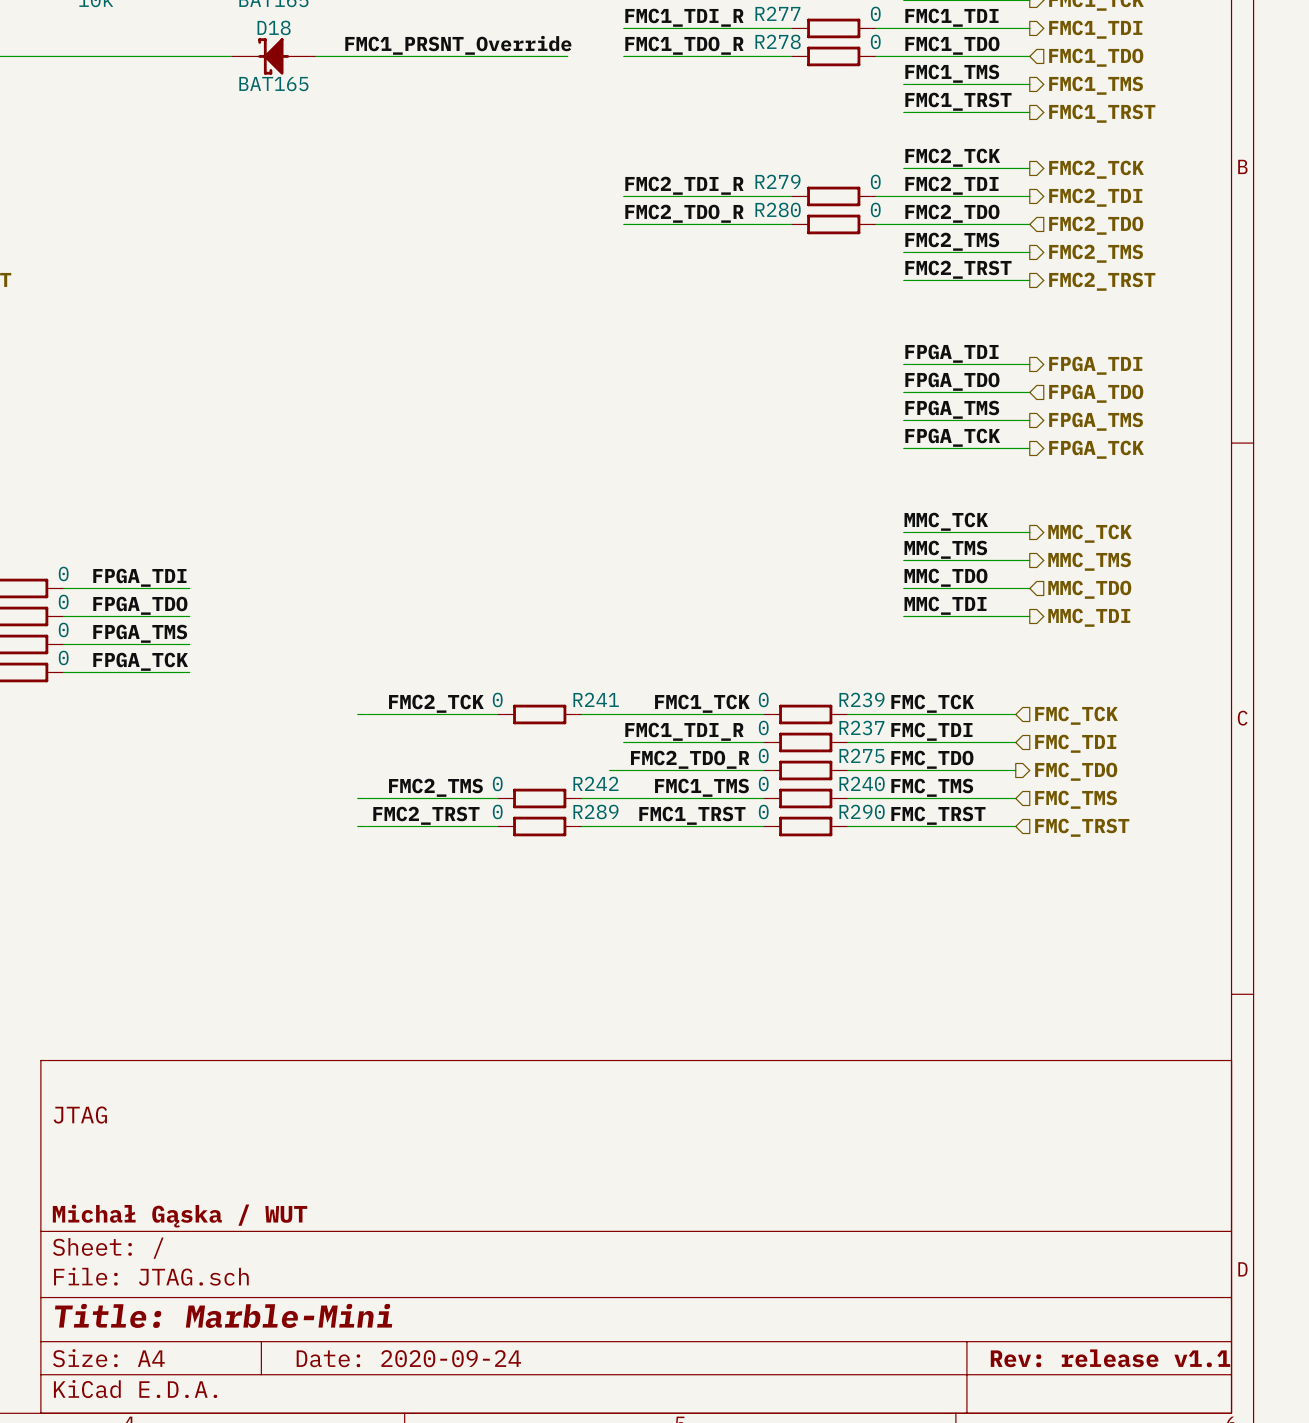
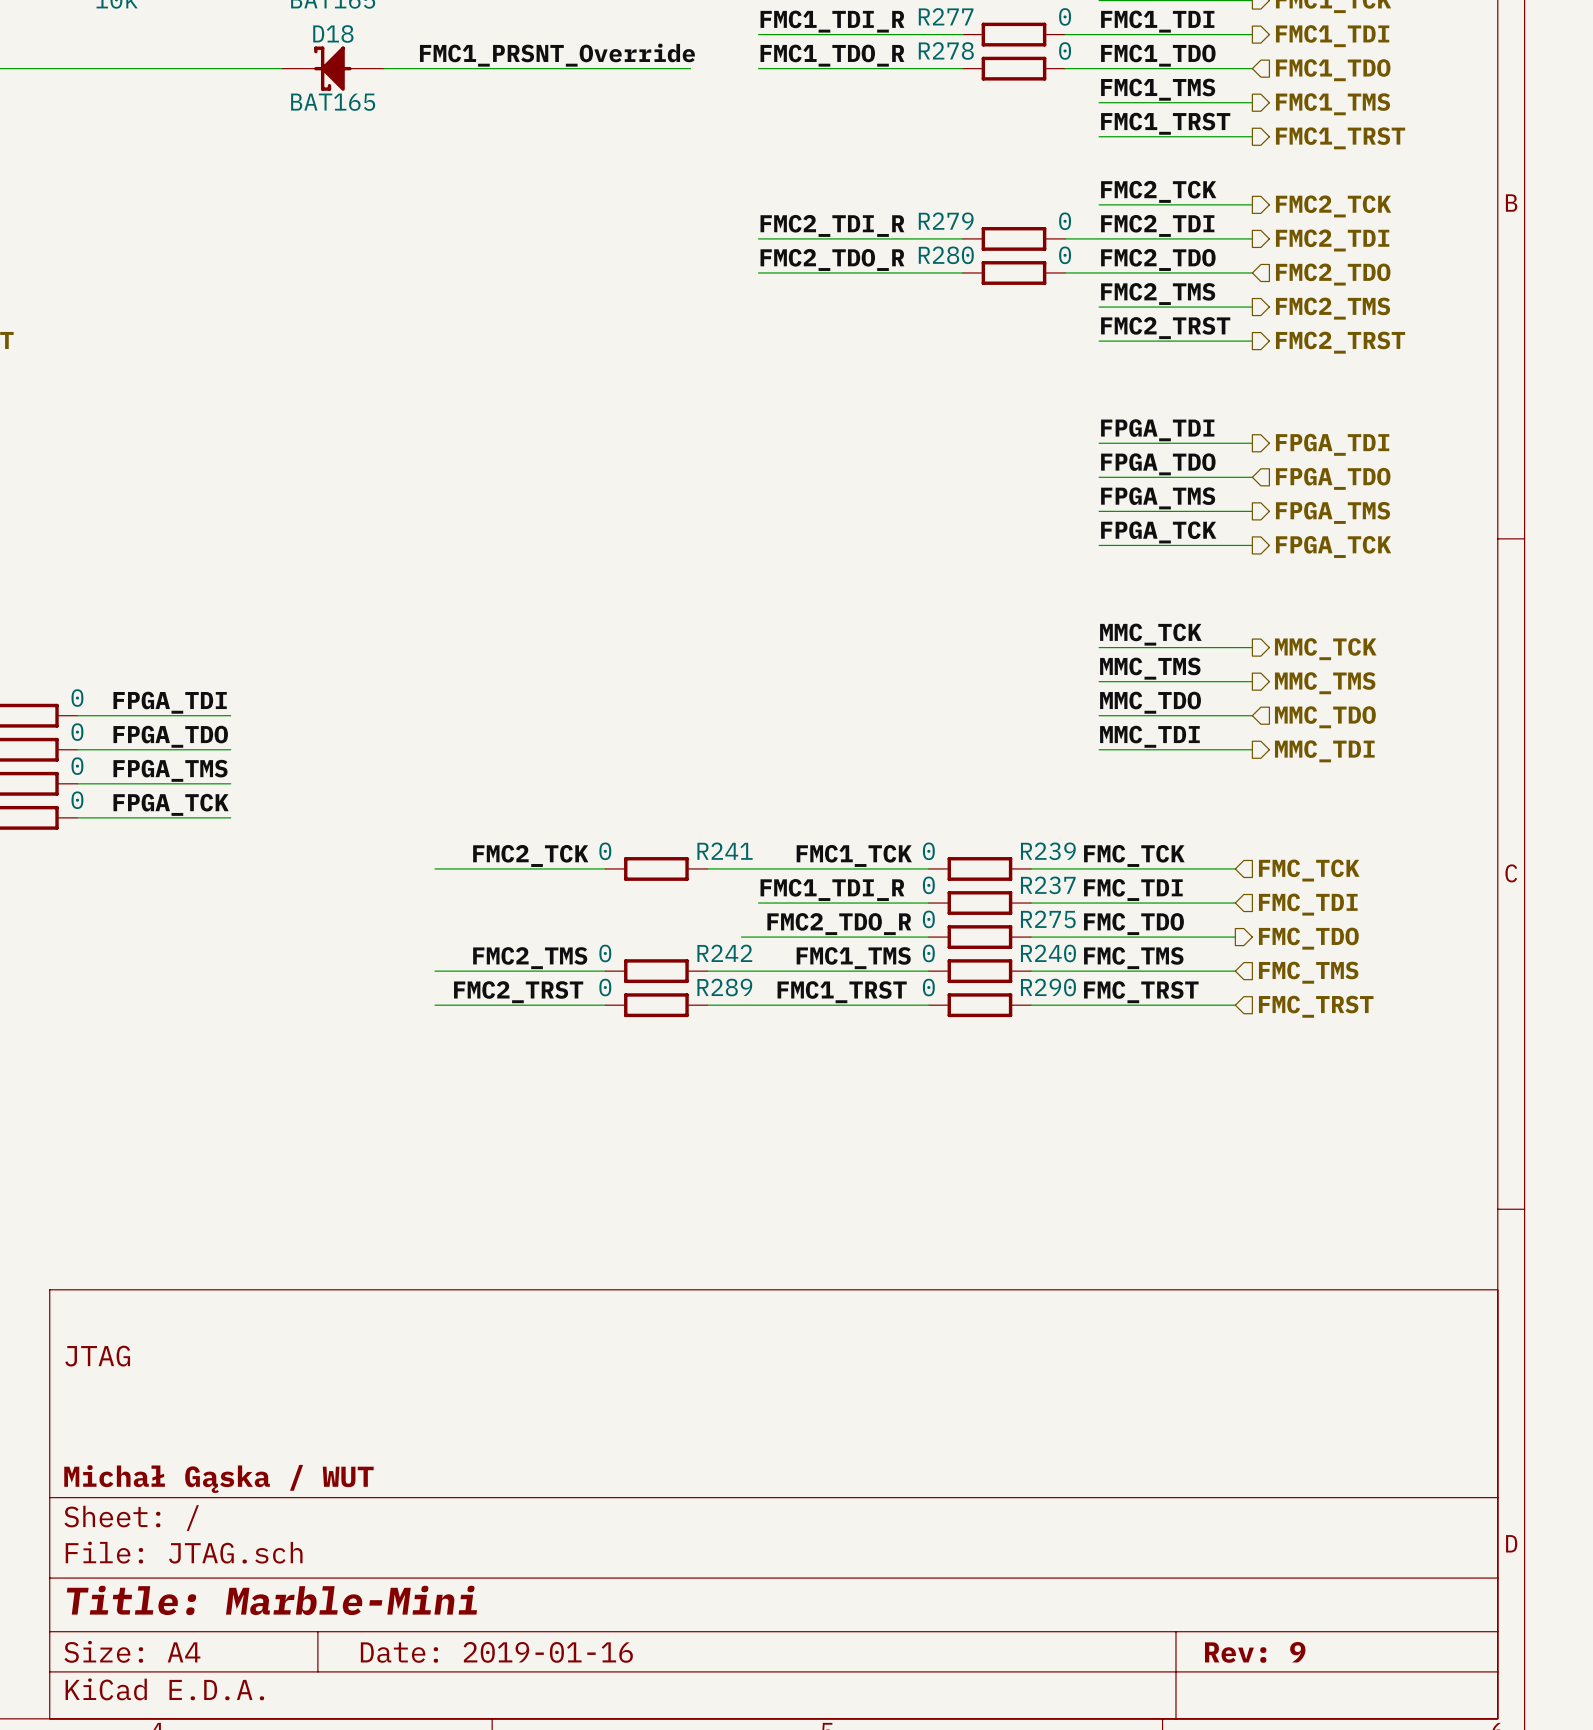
title block: Date: 2020-09-24 (408, 1358) -> Date: 2019-01-16 (496, 1652)
title block: Rev: release v1.1 (1110, 1358) -> Rev: 9 (1255, 1652)

